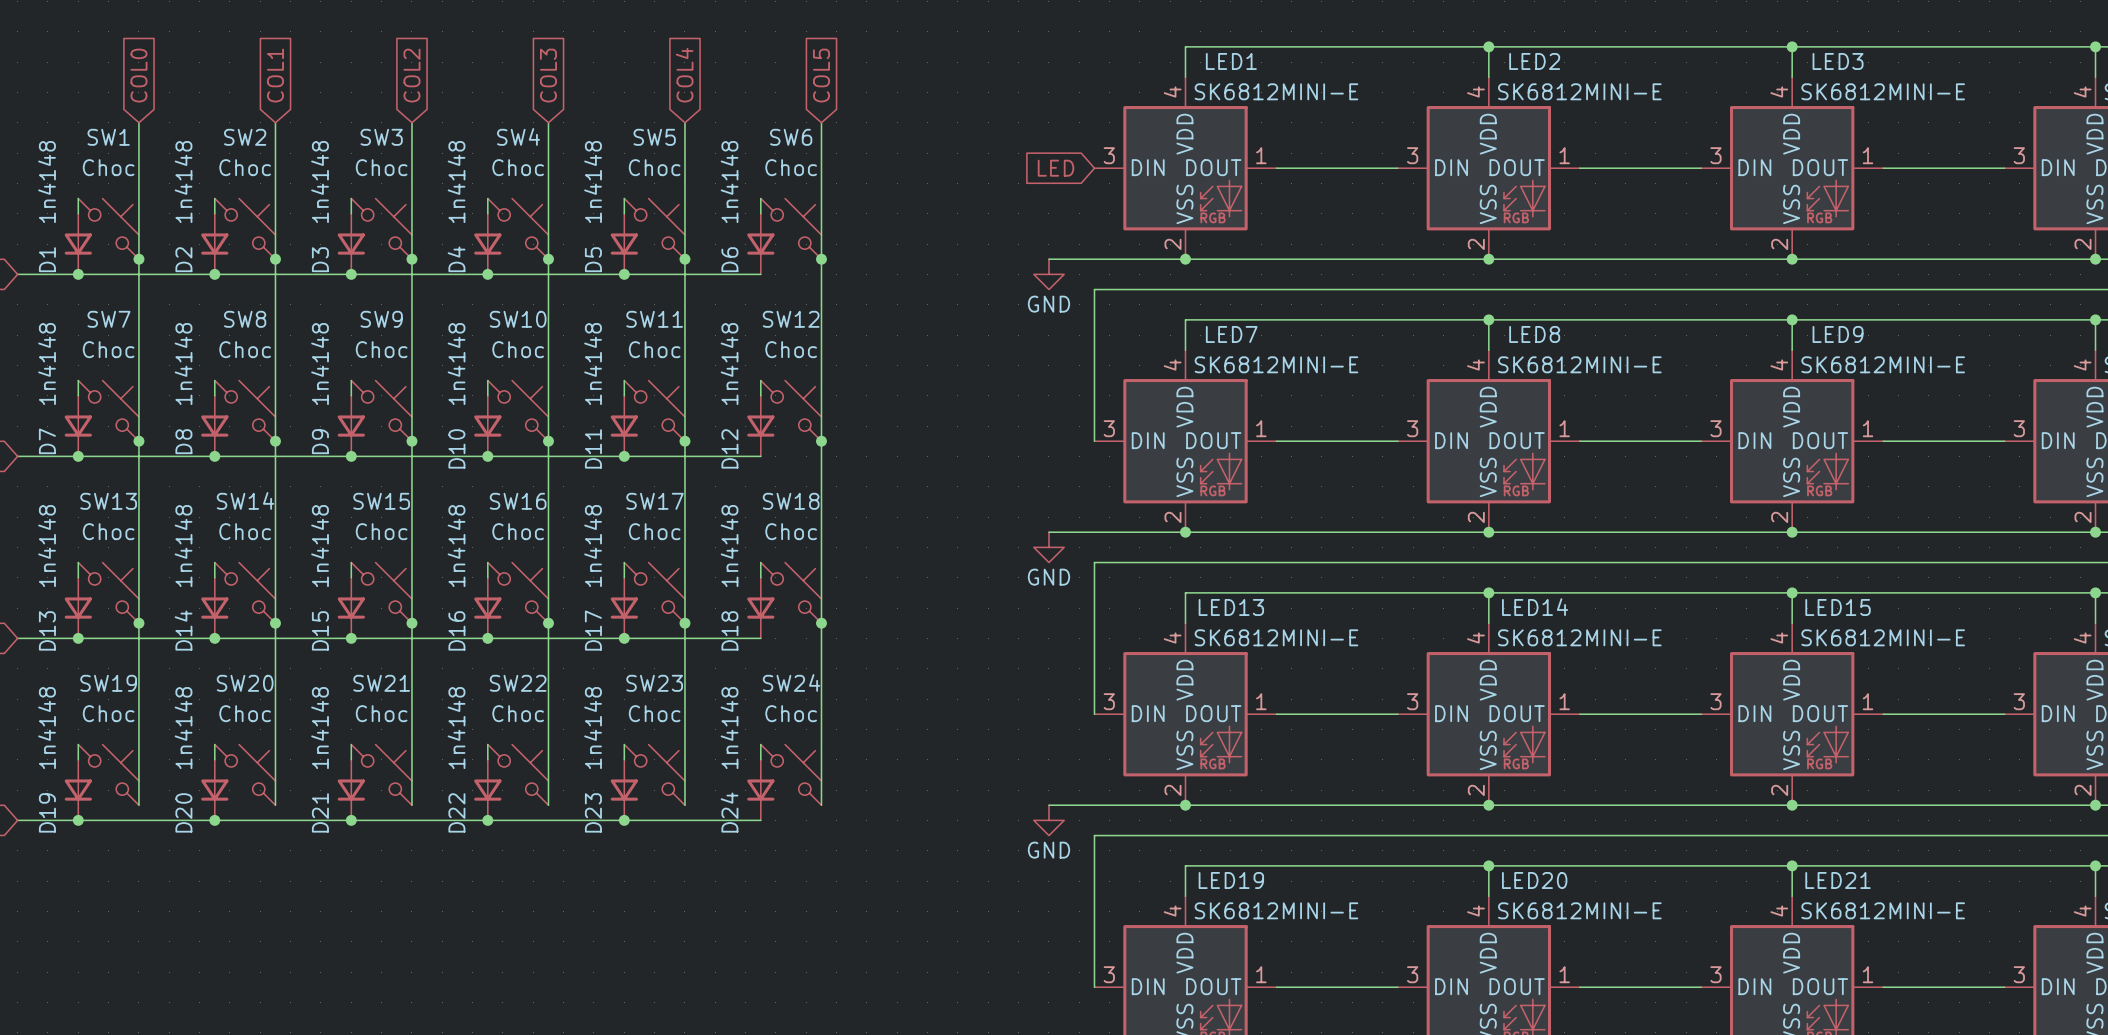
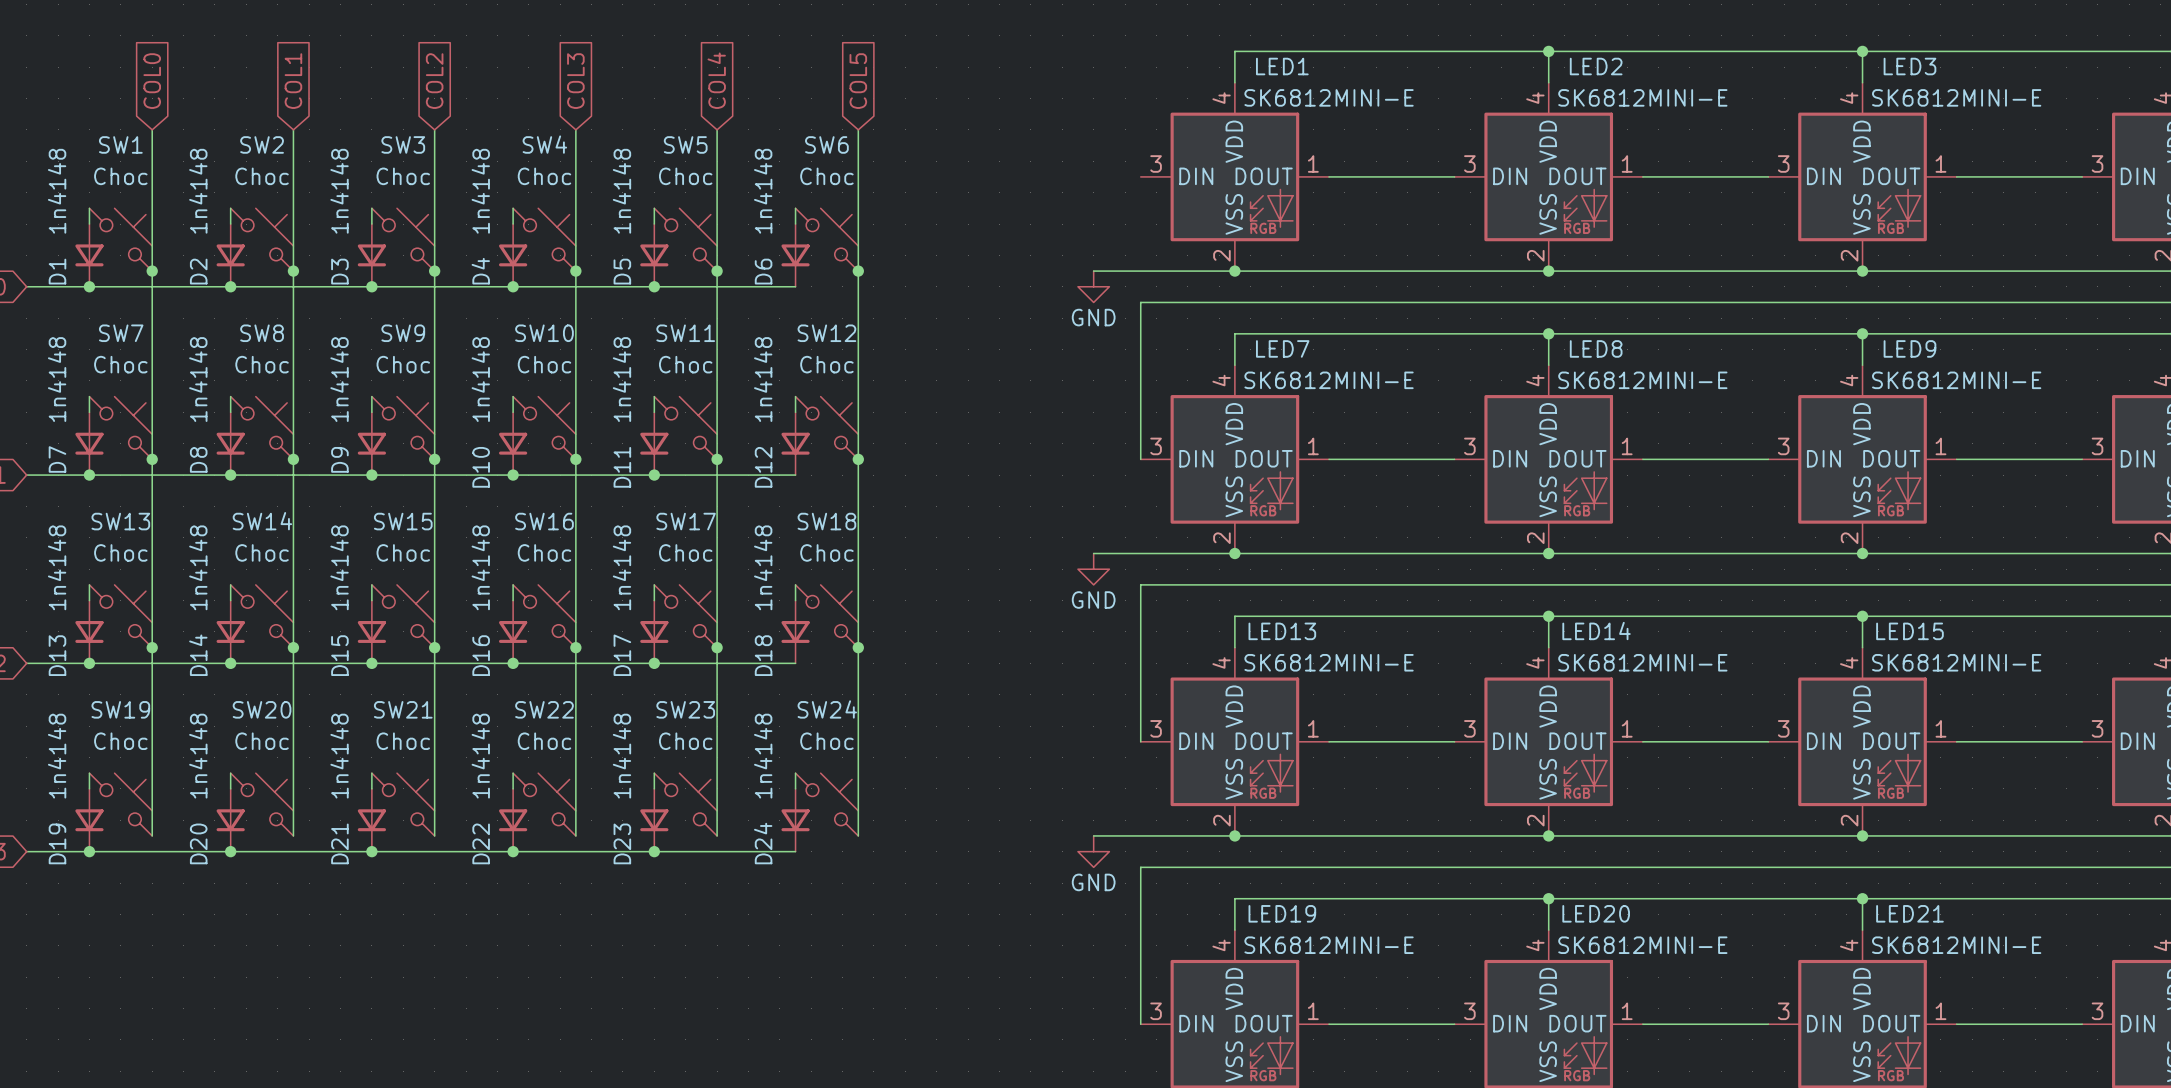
global label: LED (1056, 168) -> none

